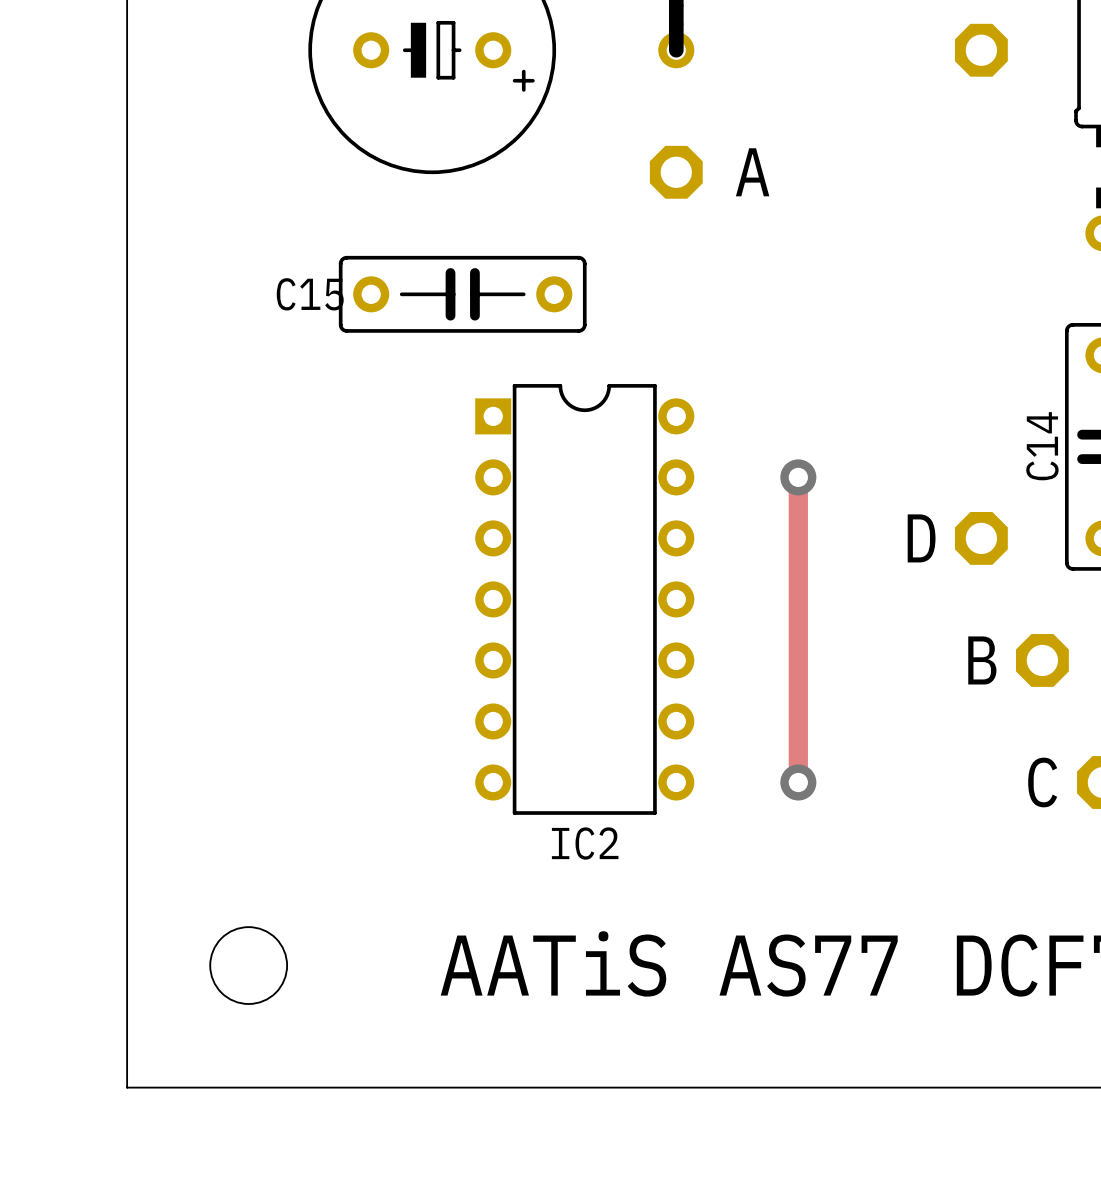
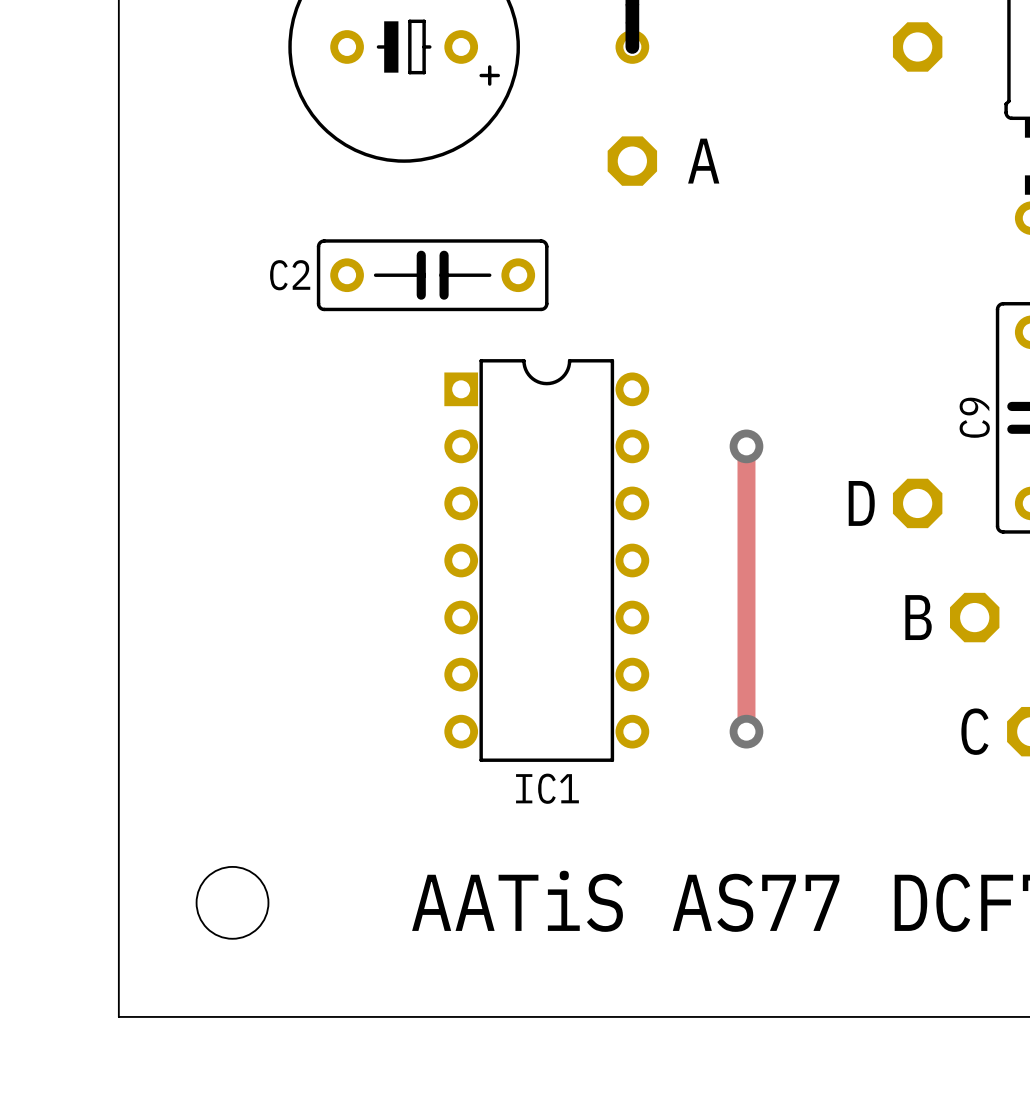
C15 name: C15 (310, 294) -> C2 (290, 275)
C14 name: C14 (1042, 446) -> C9 (974, 417)
IC2 name: IC2 (585, 843) -> IC1 (547, 788)

